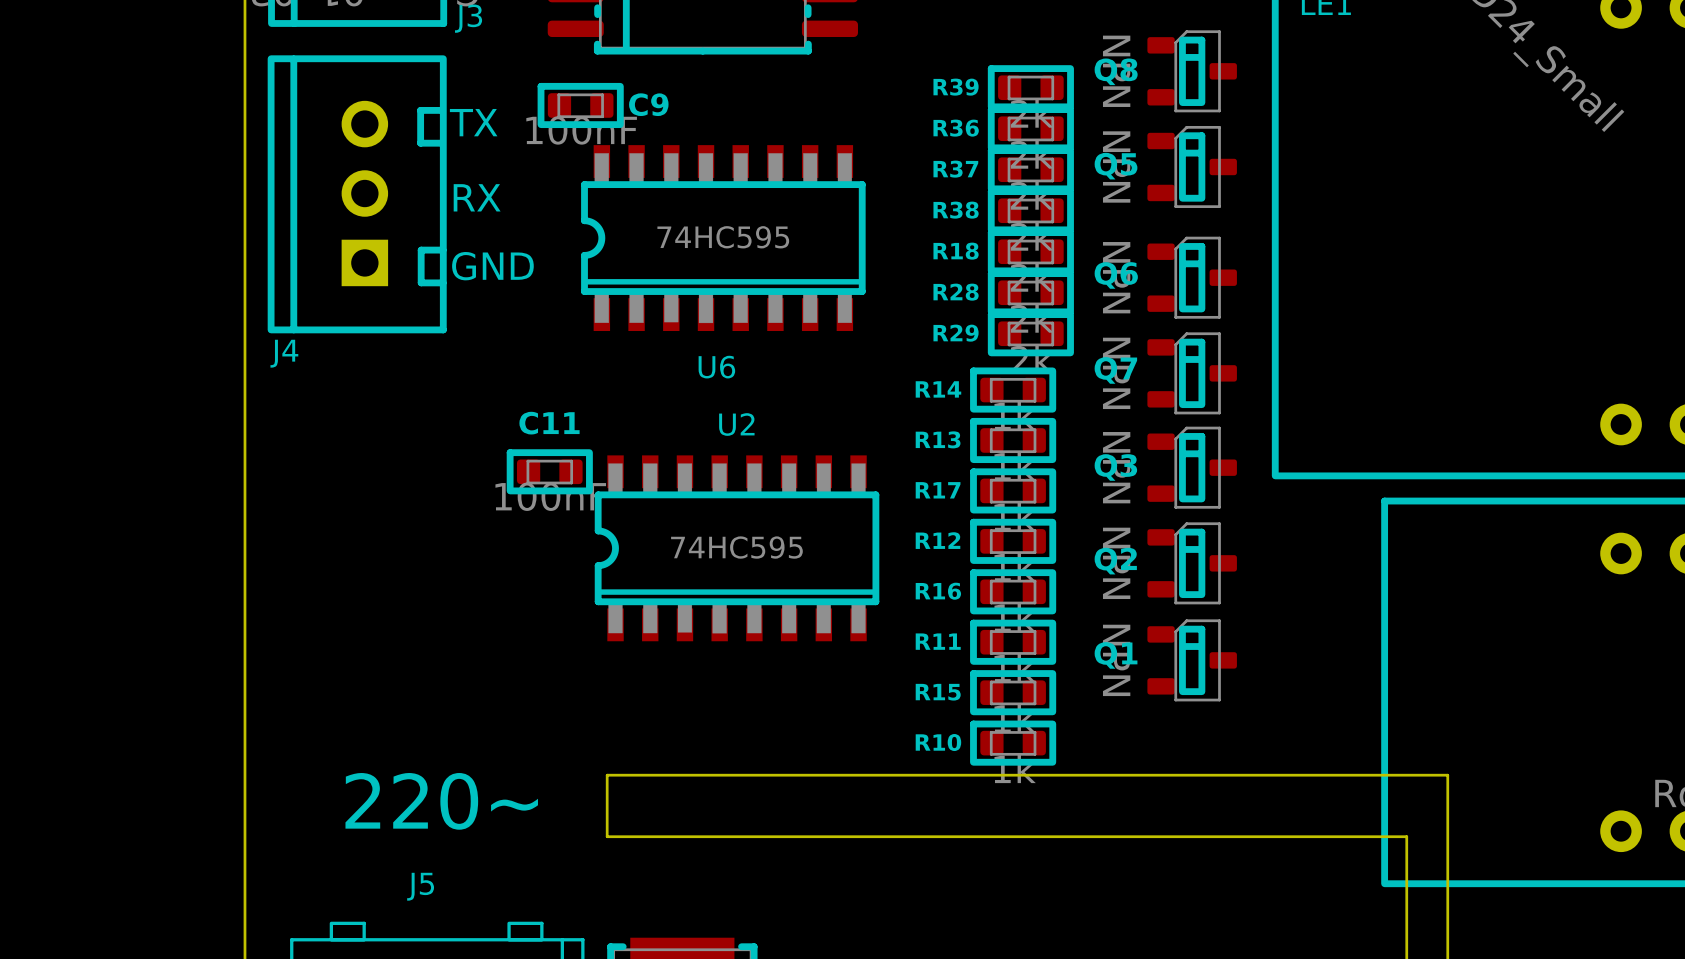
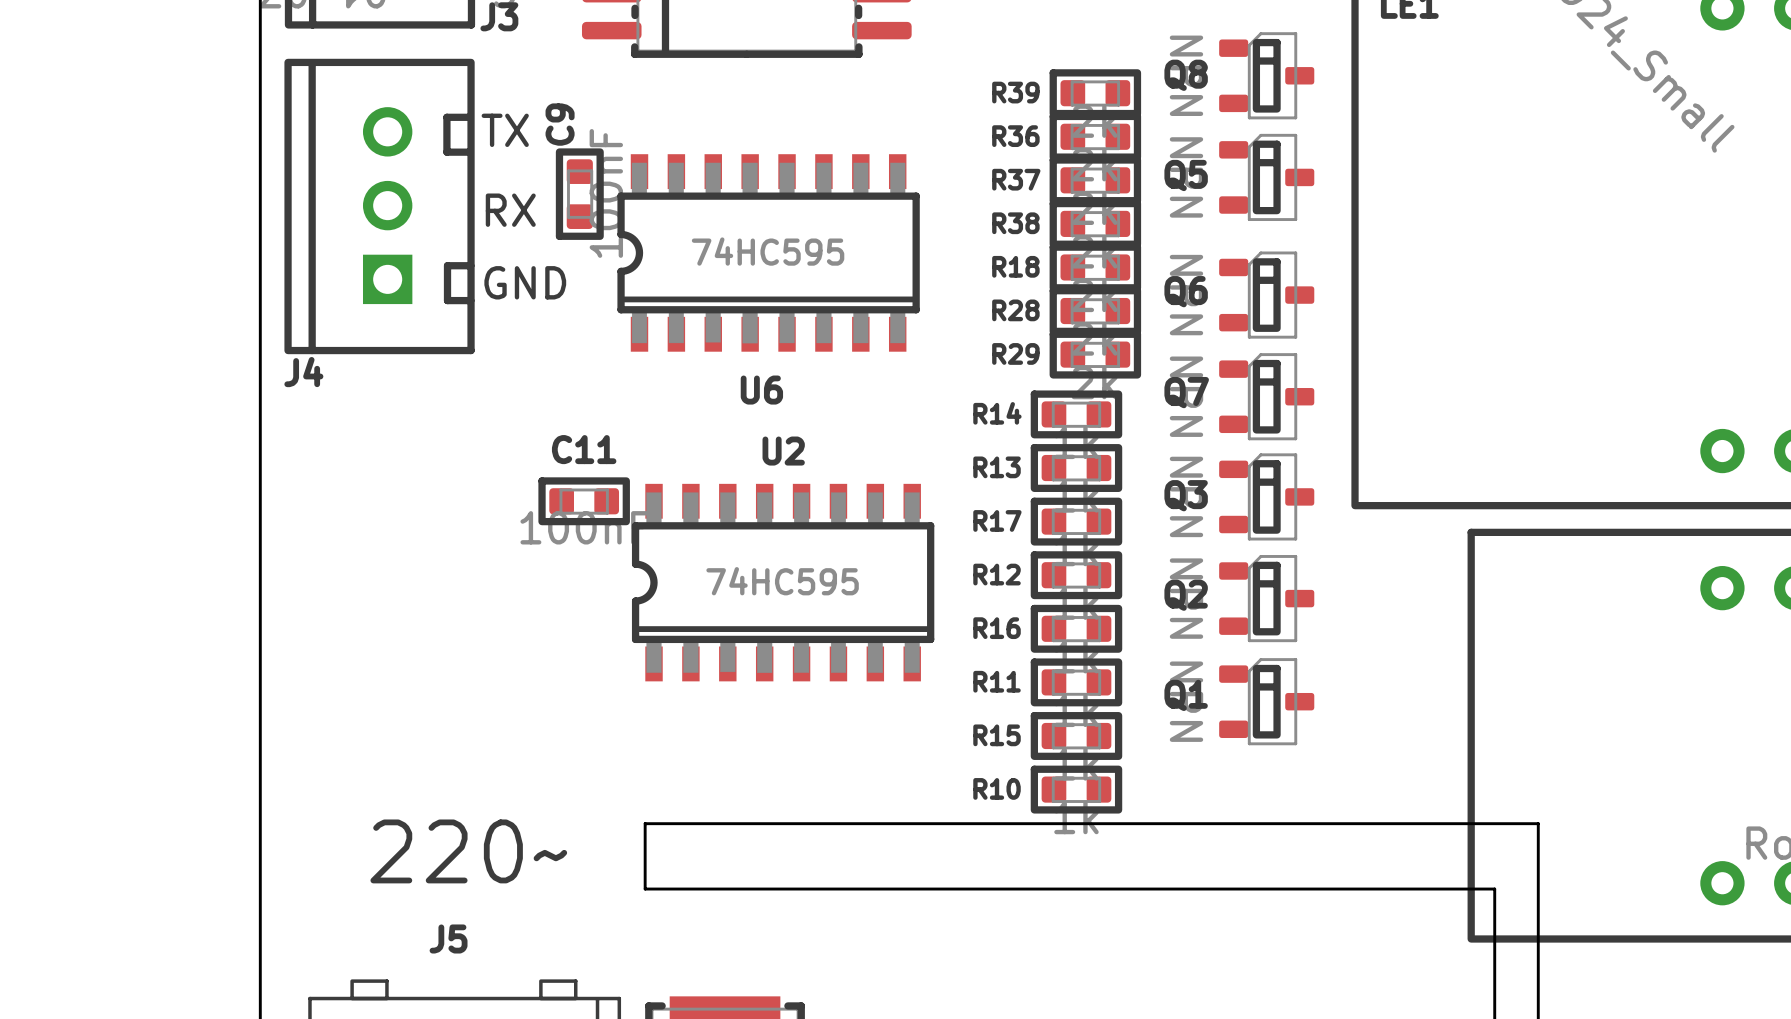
C9 name position: C9 (648, 104) -> C9 (560, 124)
C9 rotation: 0° (580, 105) -> 90° clockwise (579, 194)
C9 position: (580, 105) -> (579, 194)

